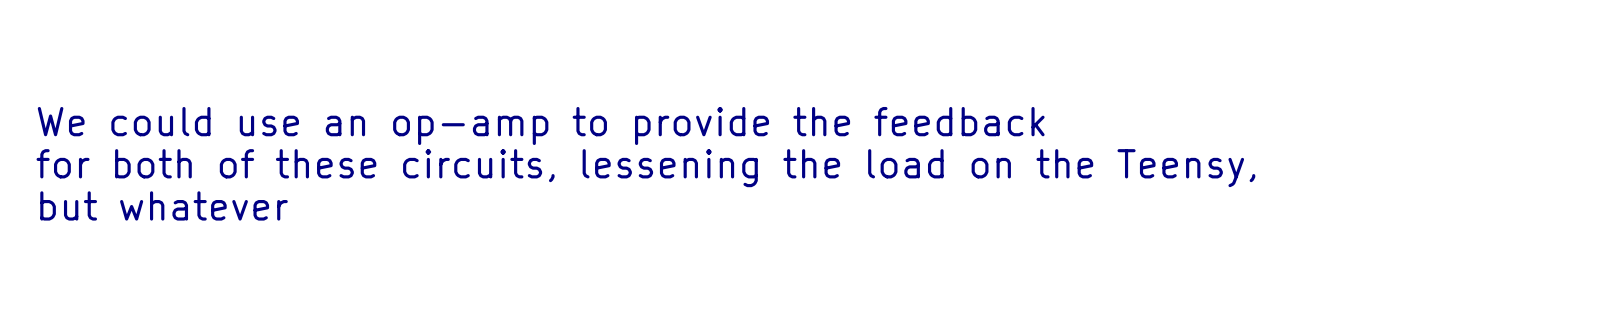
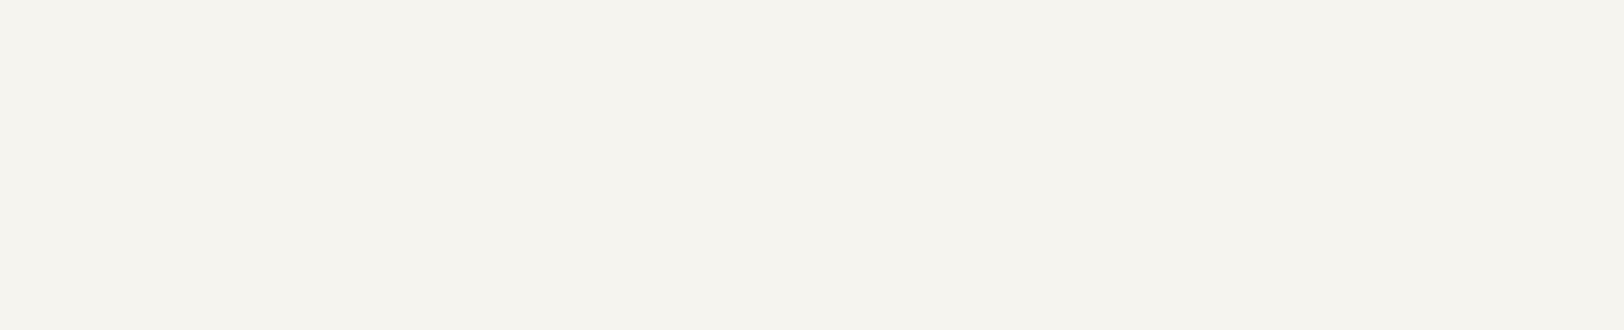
text: We could use an op-amp to provide the feedback (541, 125) -> none
text: for both of these circuits, lessening the load on the Teensy, (645, 168) -> none
text: but whatever (164, 205) -> none

